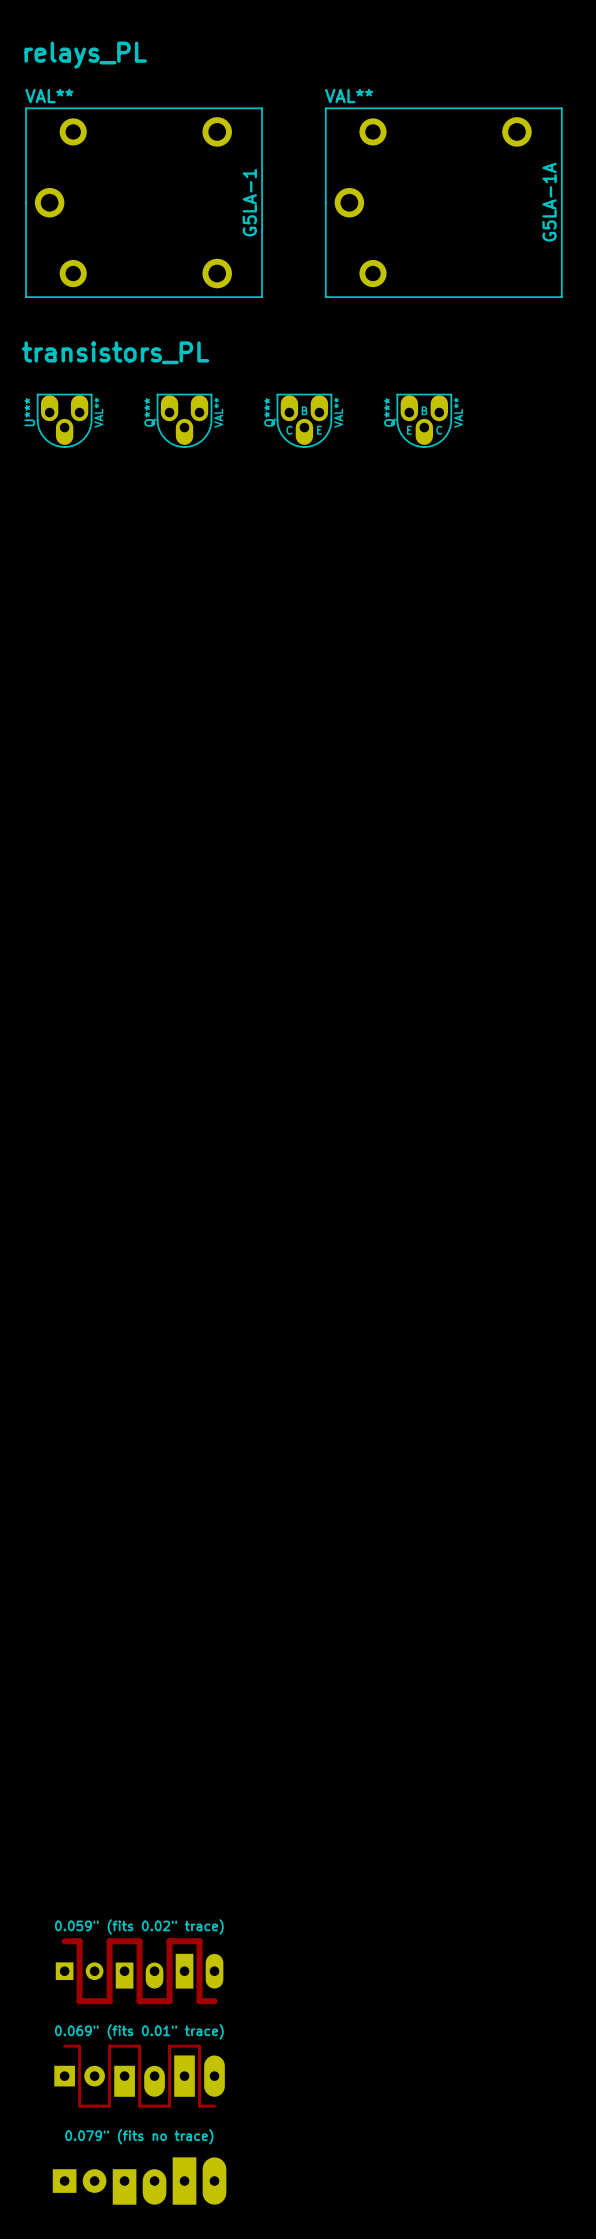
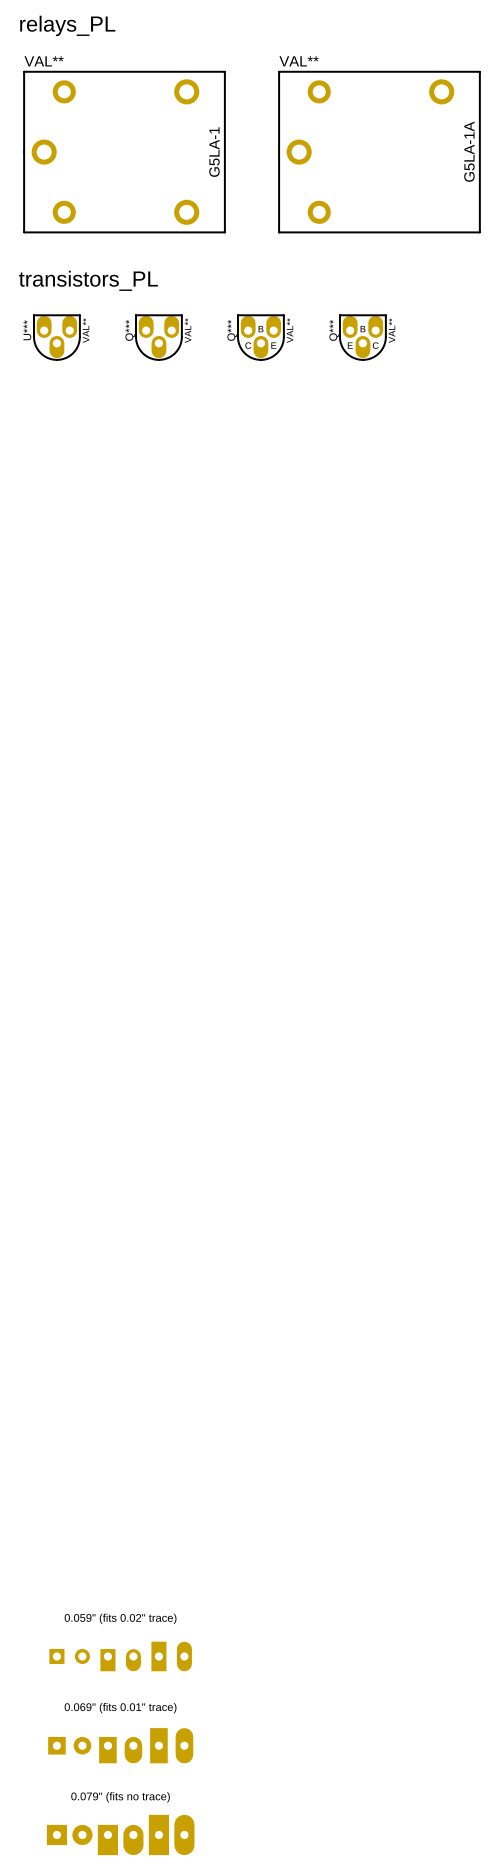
track: (64, 1941) (79, 1941) (79, 2001) (109, 2001) (109, 1941) (139, 1941) (139, 2001) (169, 2001) (169, 1941) (199, 1941) (199, 2001) (214, 2001) -> none
track: (64, 2046) (79, 2046) (79, 2106) (109, 2106) (109, 2046) (139, 2046) (139, 2106) (169, 2106) (169, 2046) (199, 2046) (199, 2106) (214, 2106) -> none

